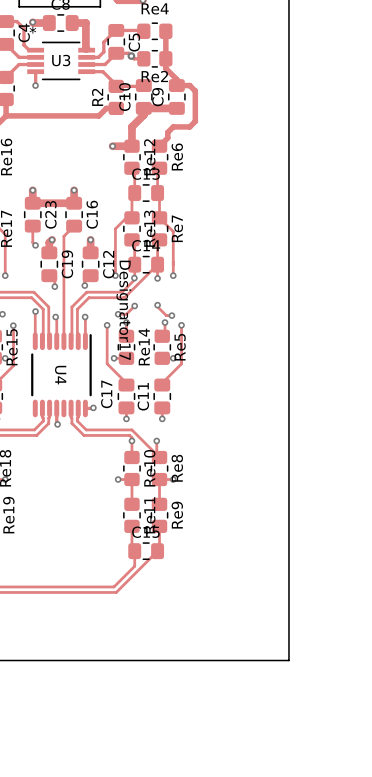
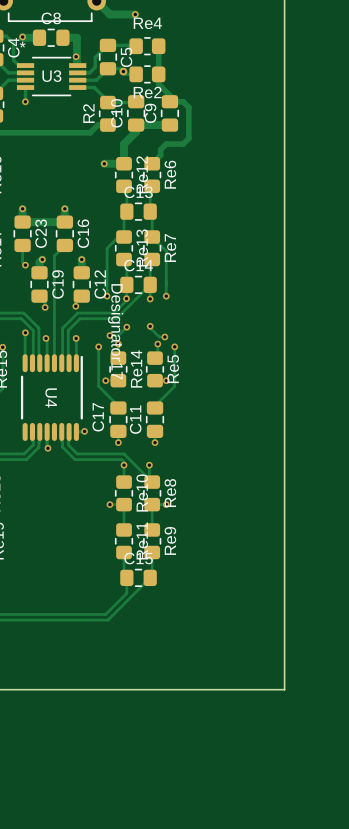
via: none -> (76, 56)

